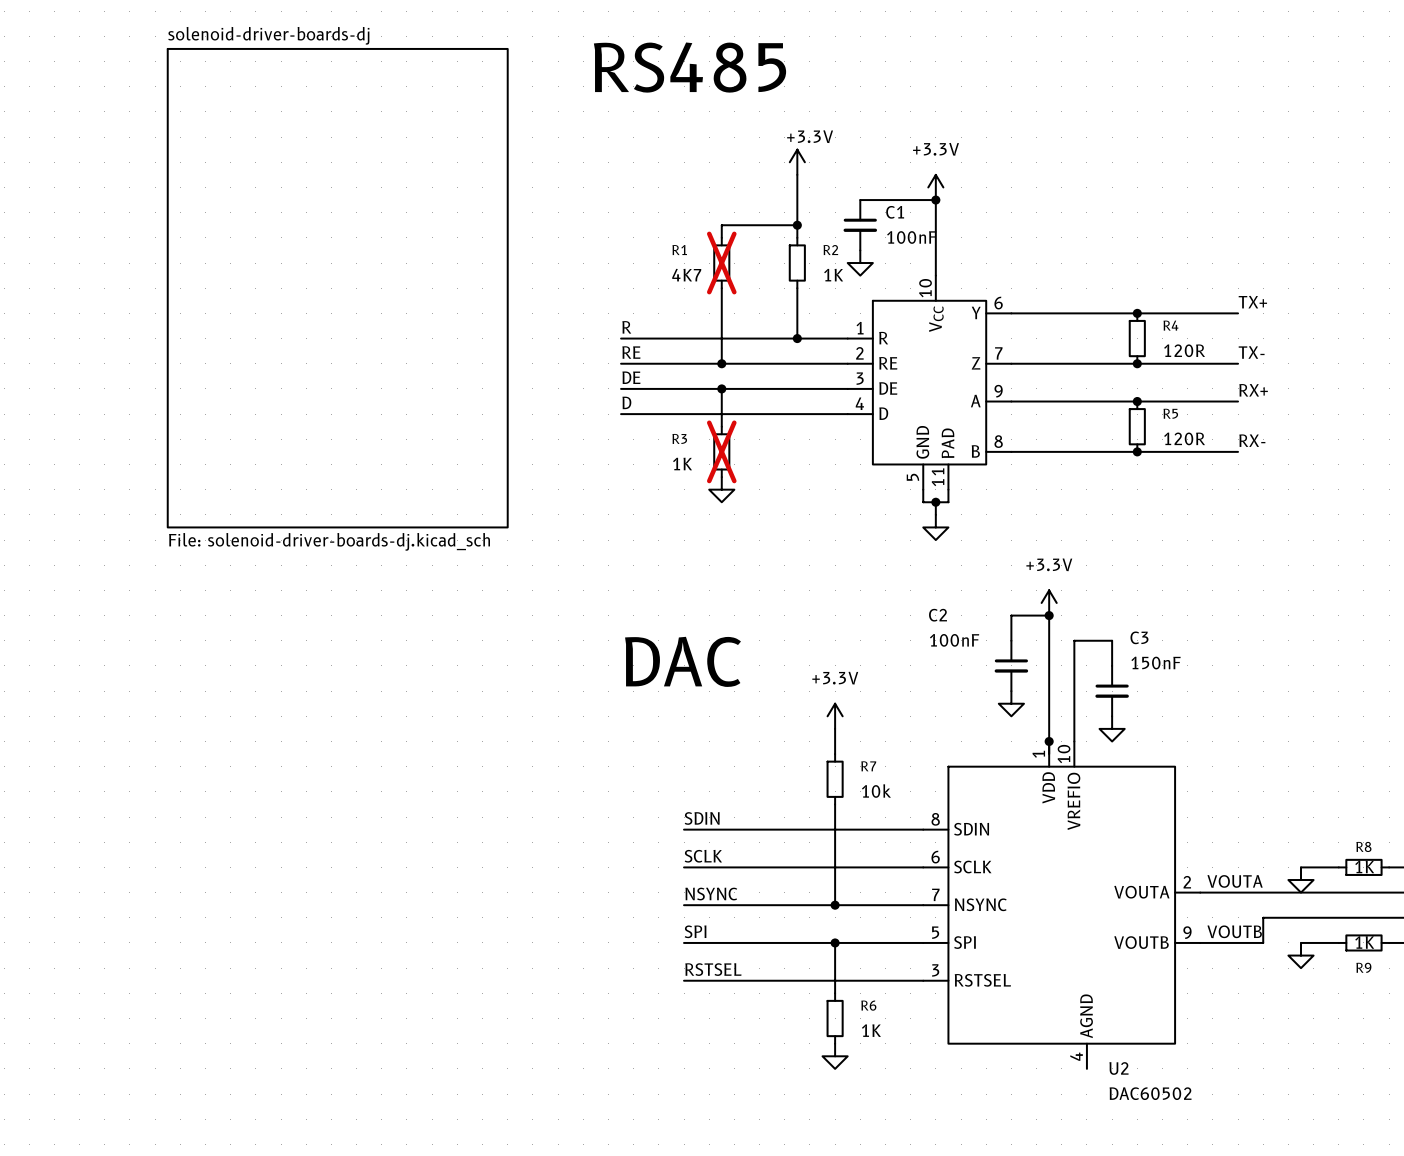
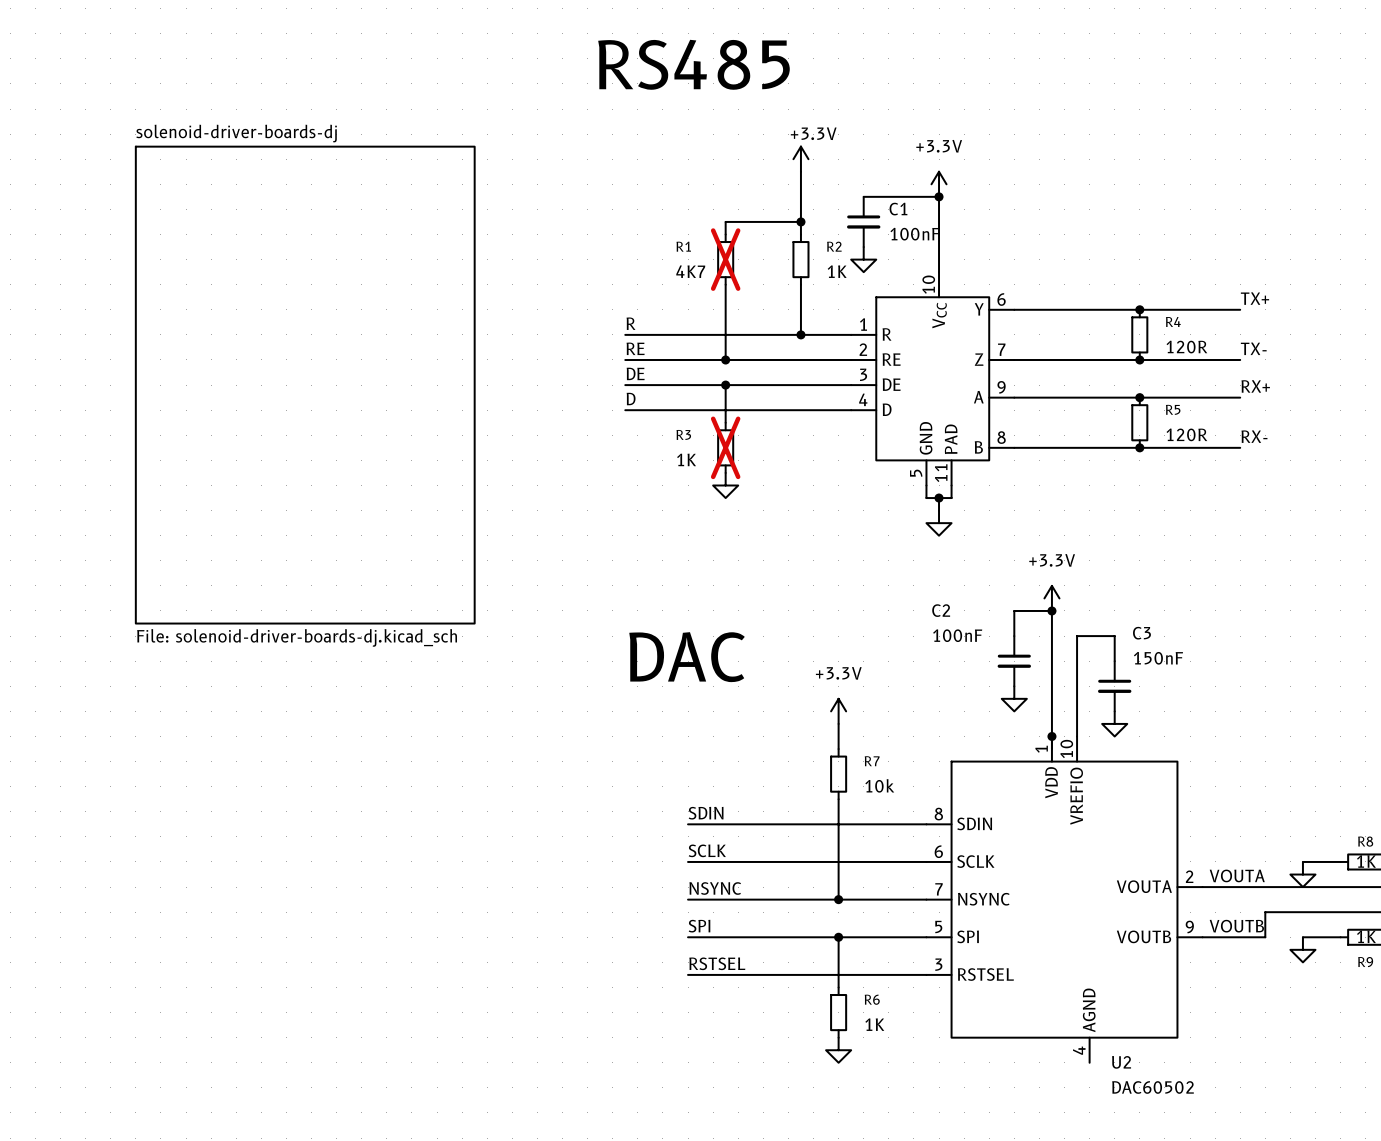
sheet solenoid-driver-boards-dj position: (337, 288) -> (305, 385)

